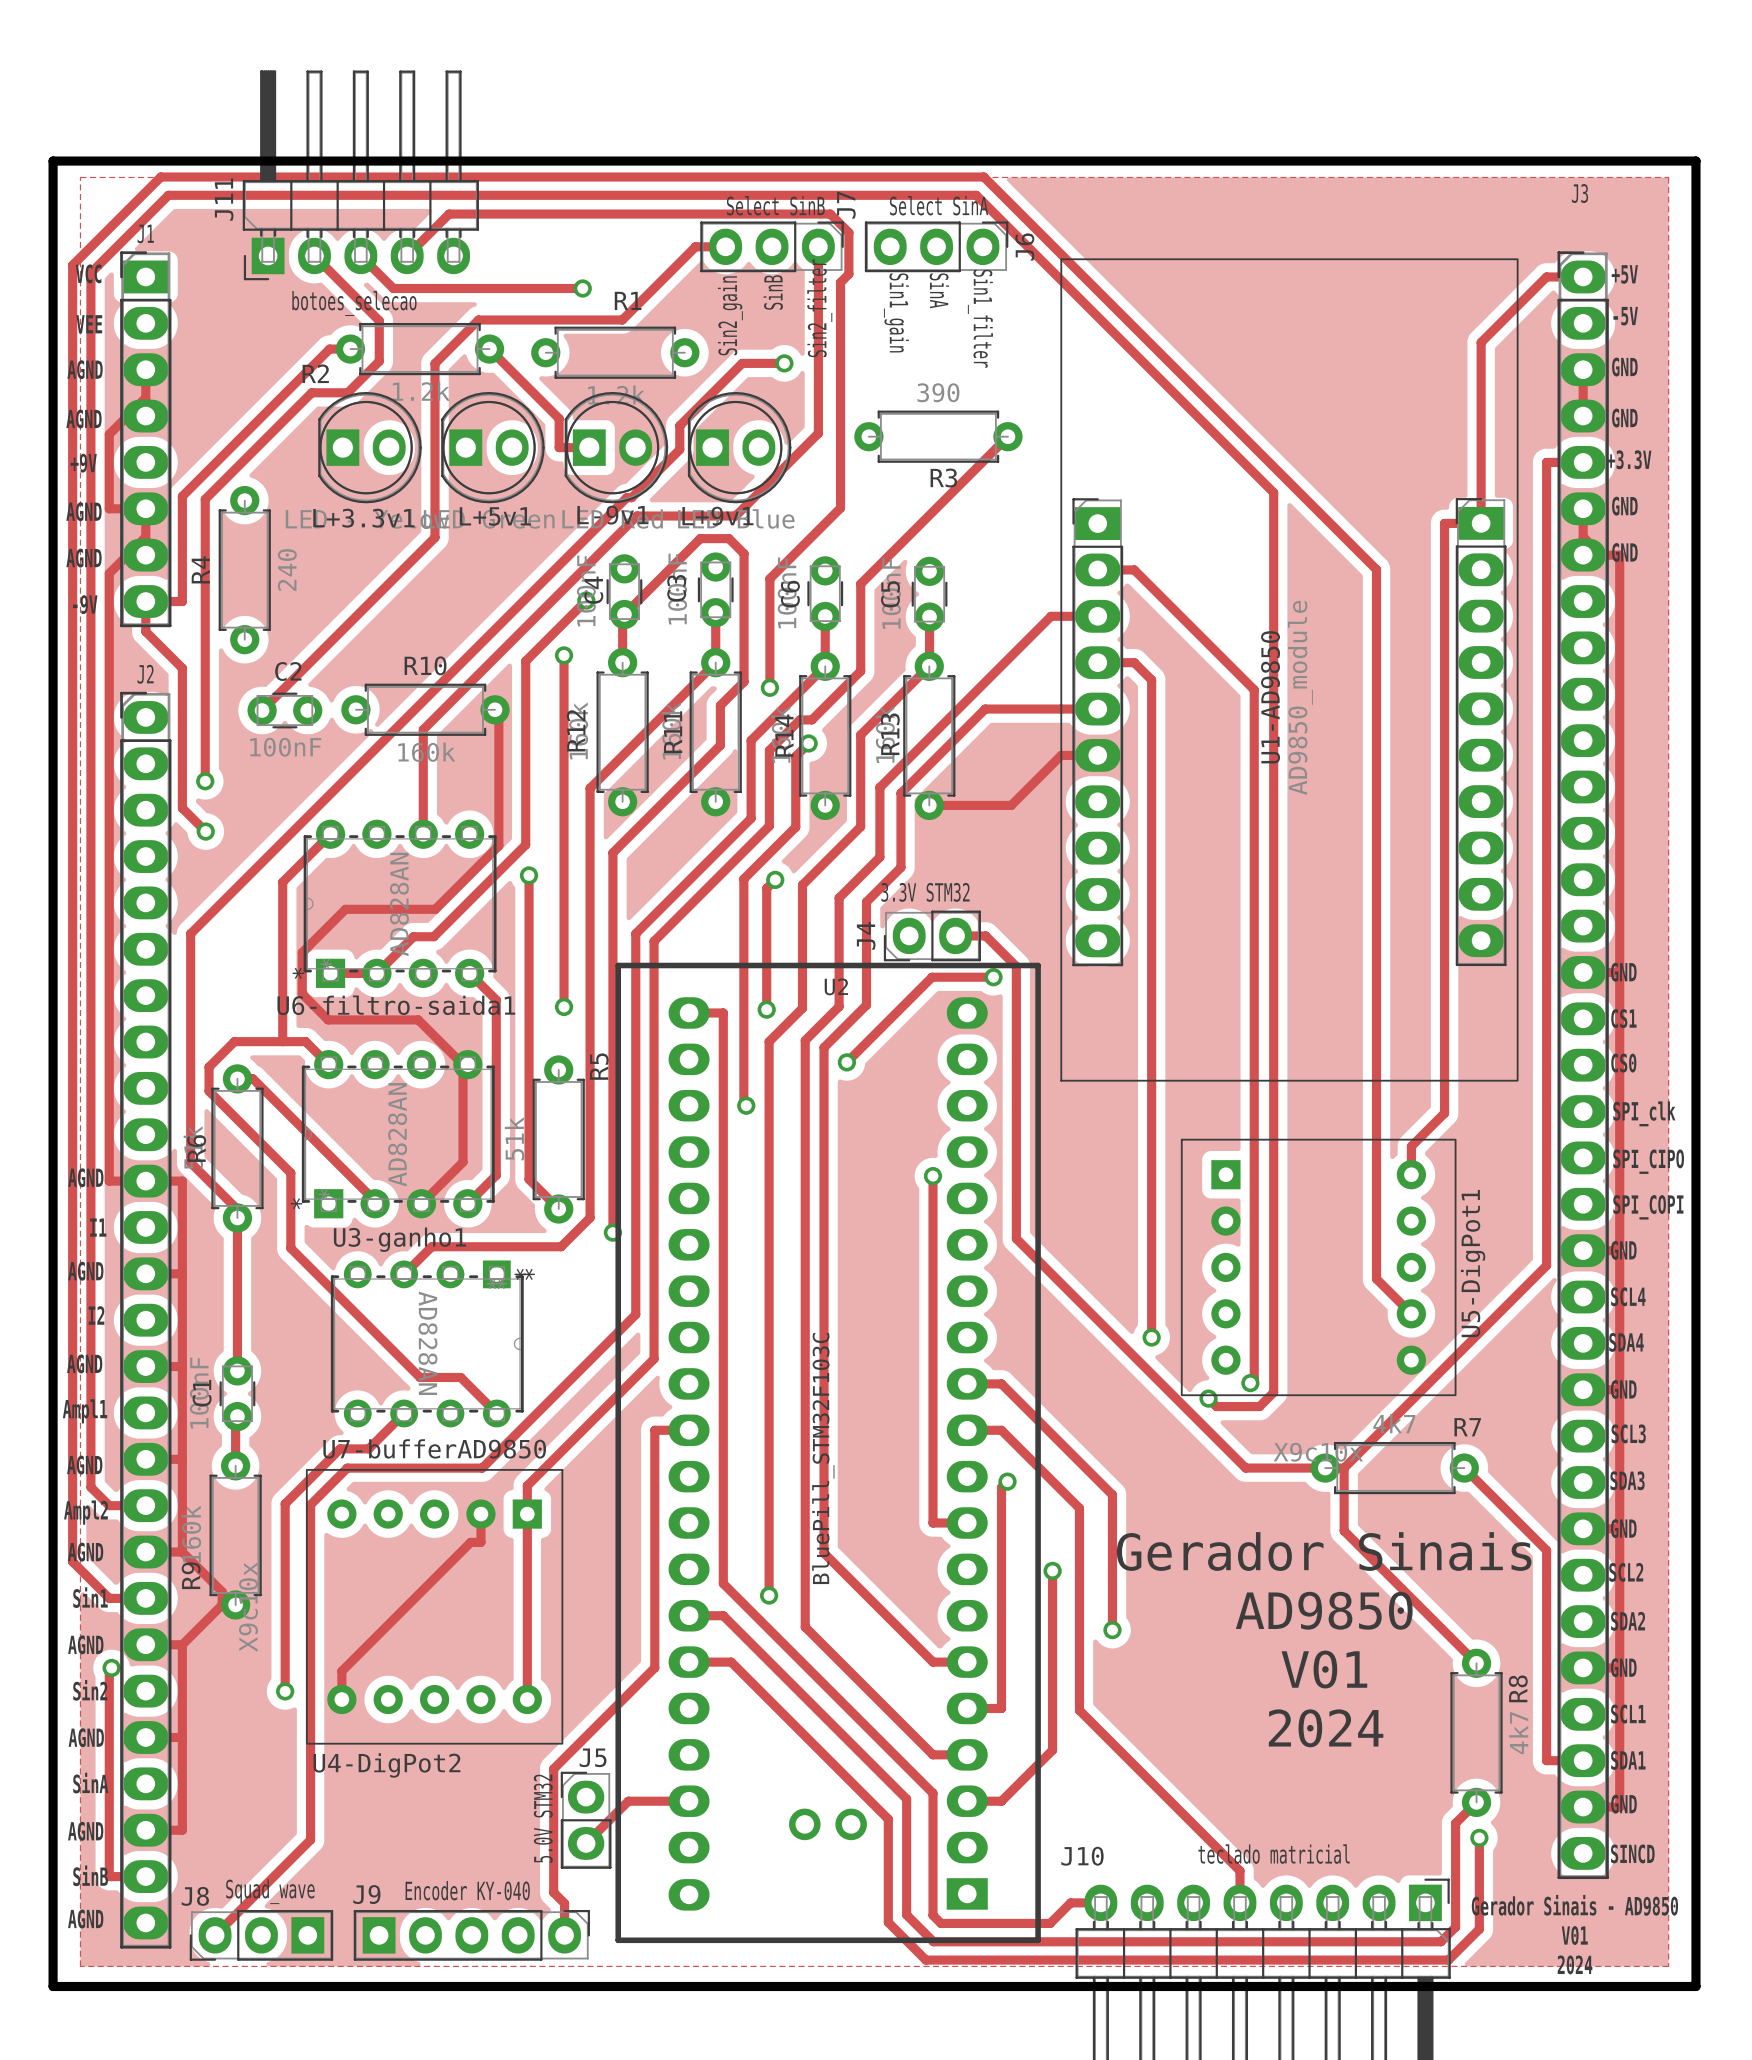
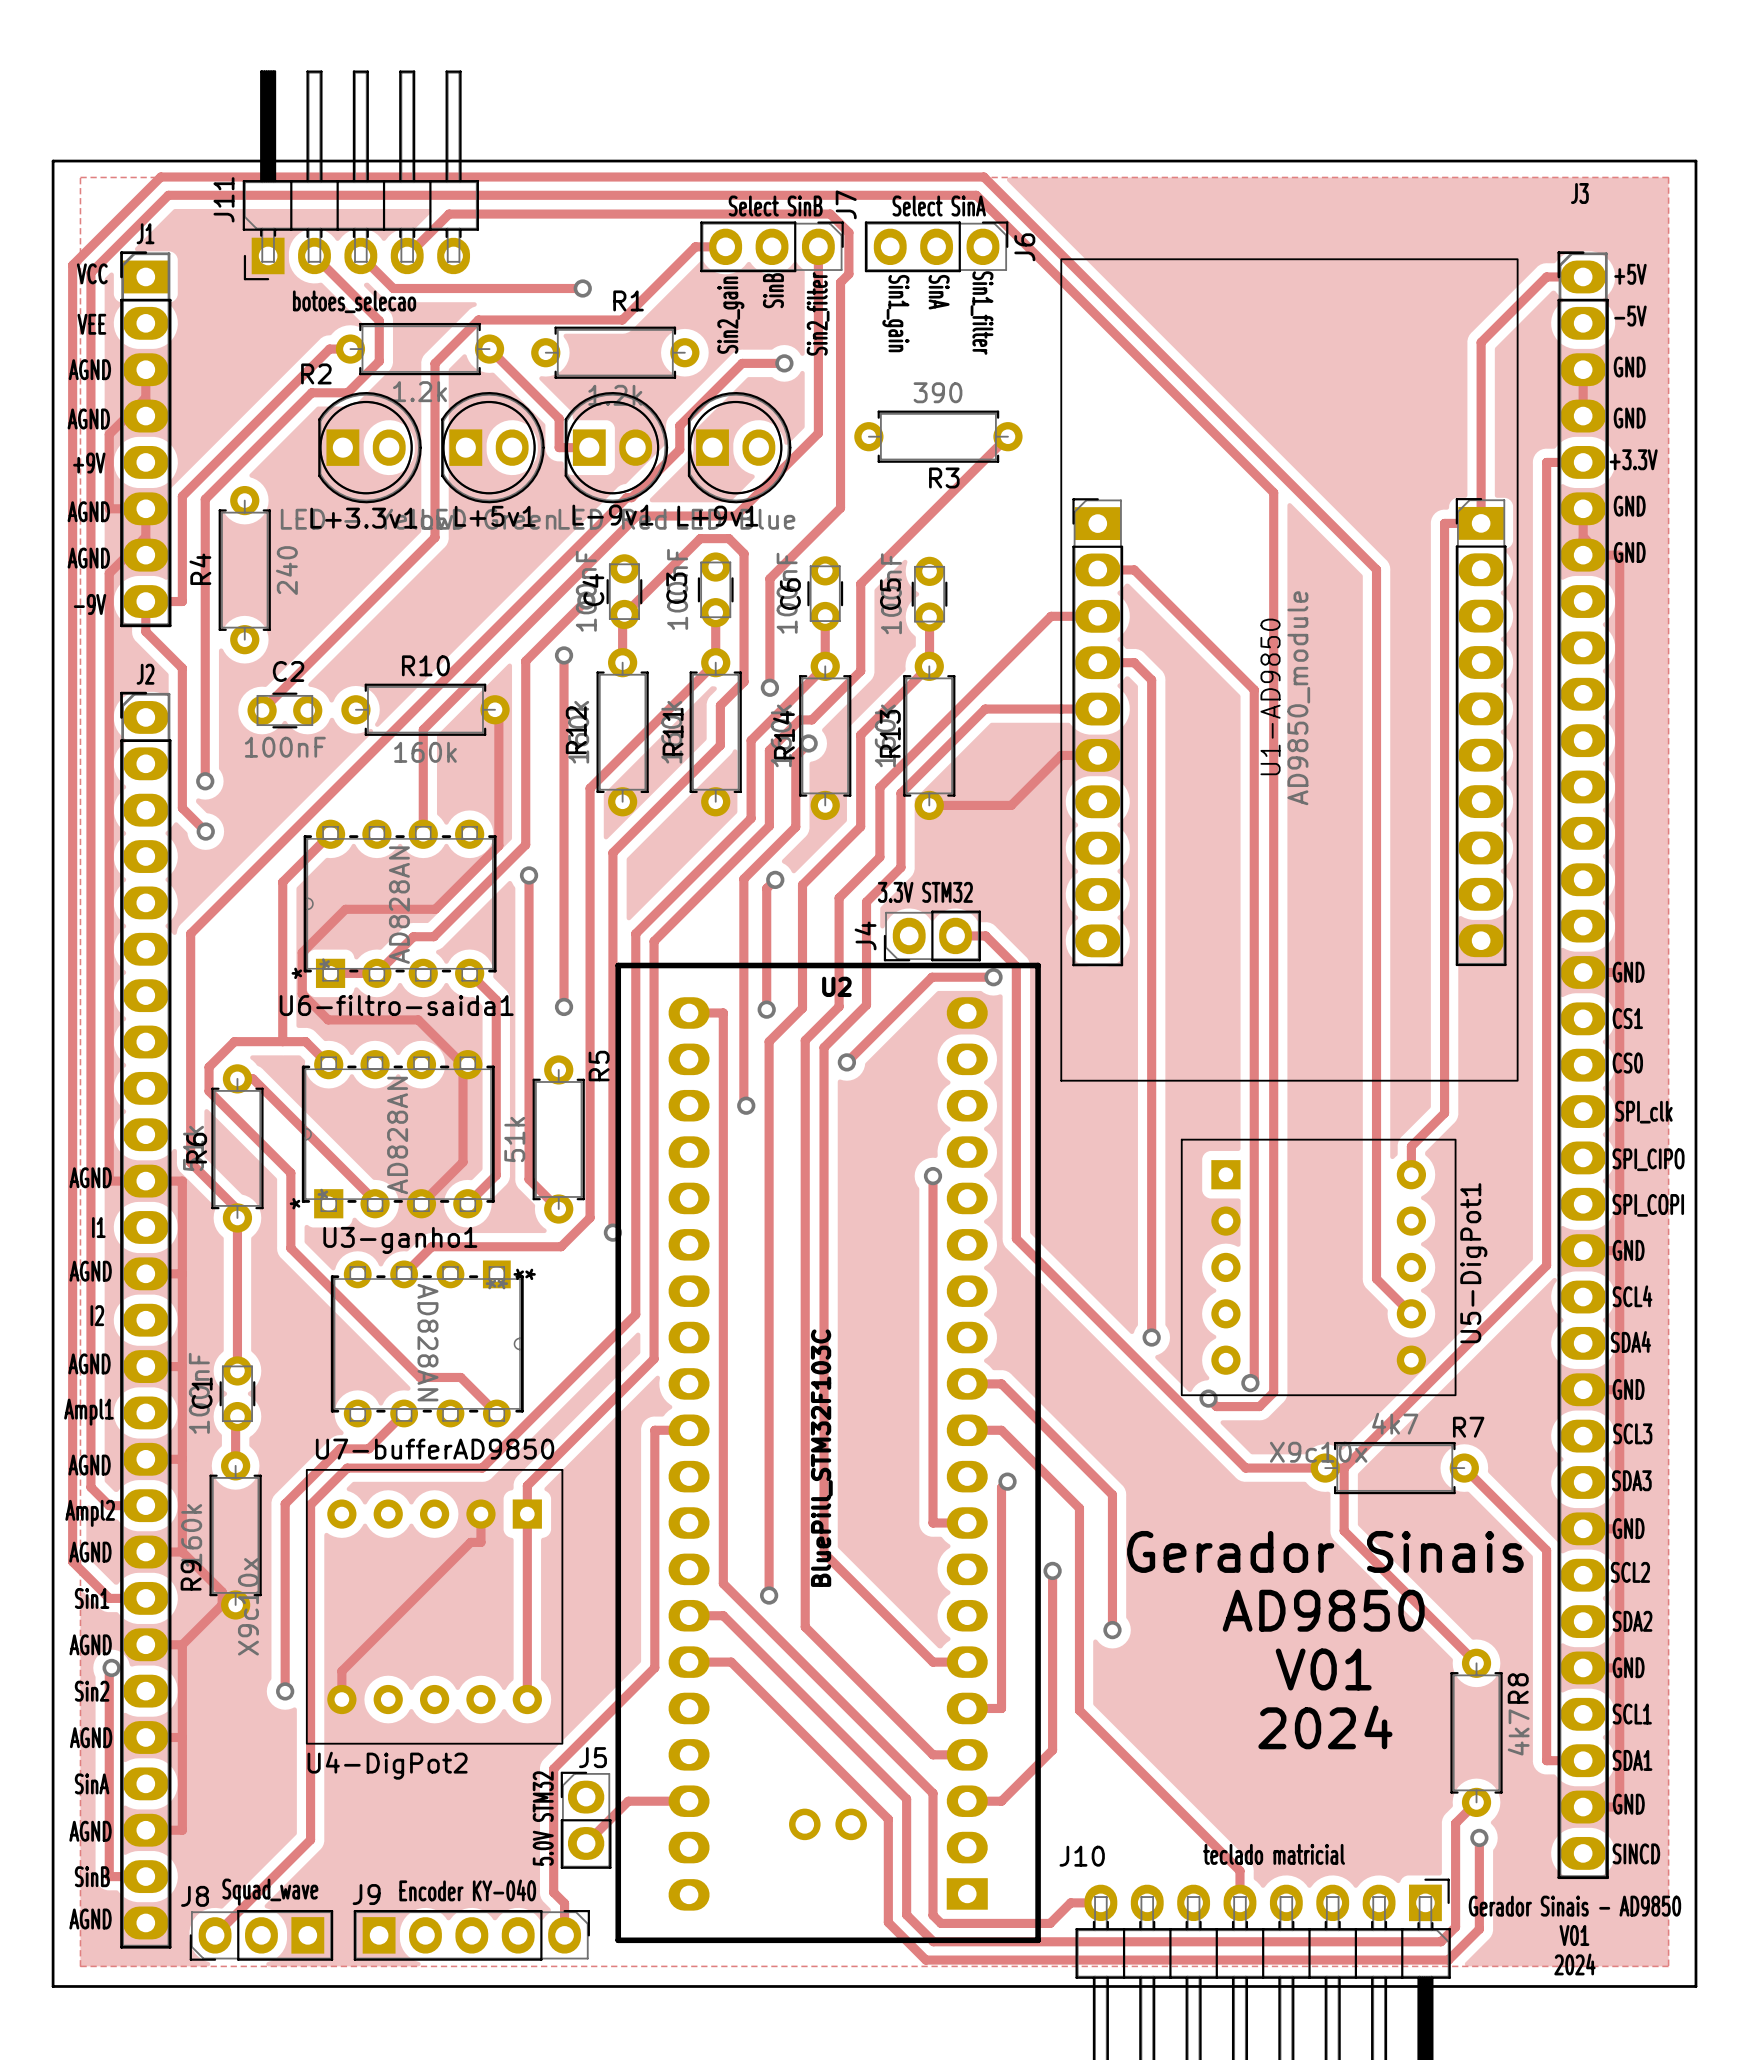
board edge width: thick (53, 161) (1695, 161) (1695, 1986) (53, 1986) (53, 161) -> thin (53, 161) (1695, 161) (1695, 1986) (53, 1986) (53, 161)

